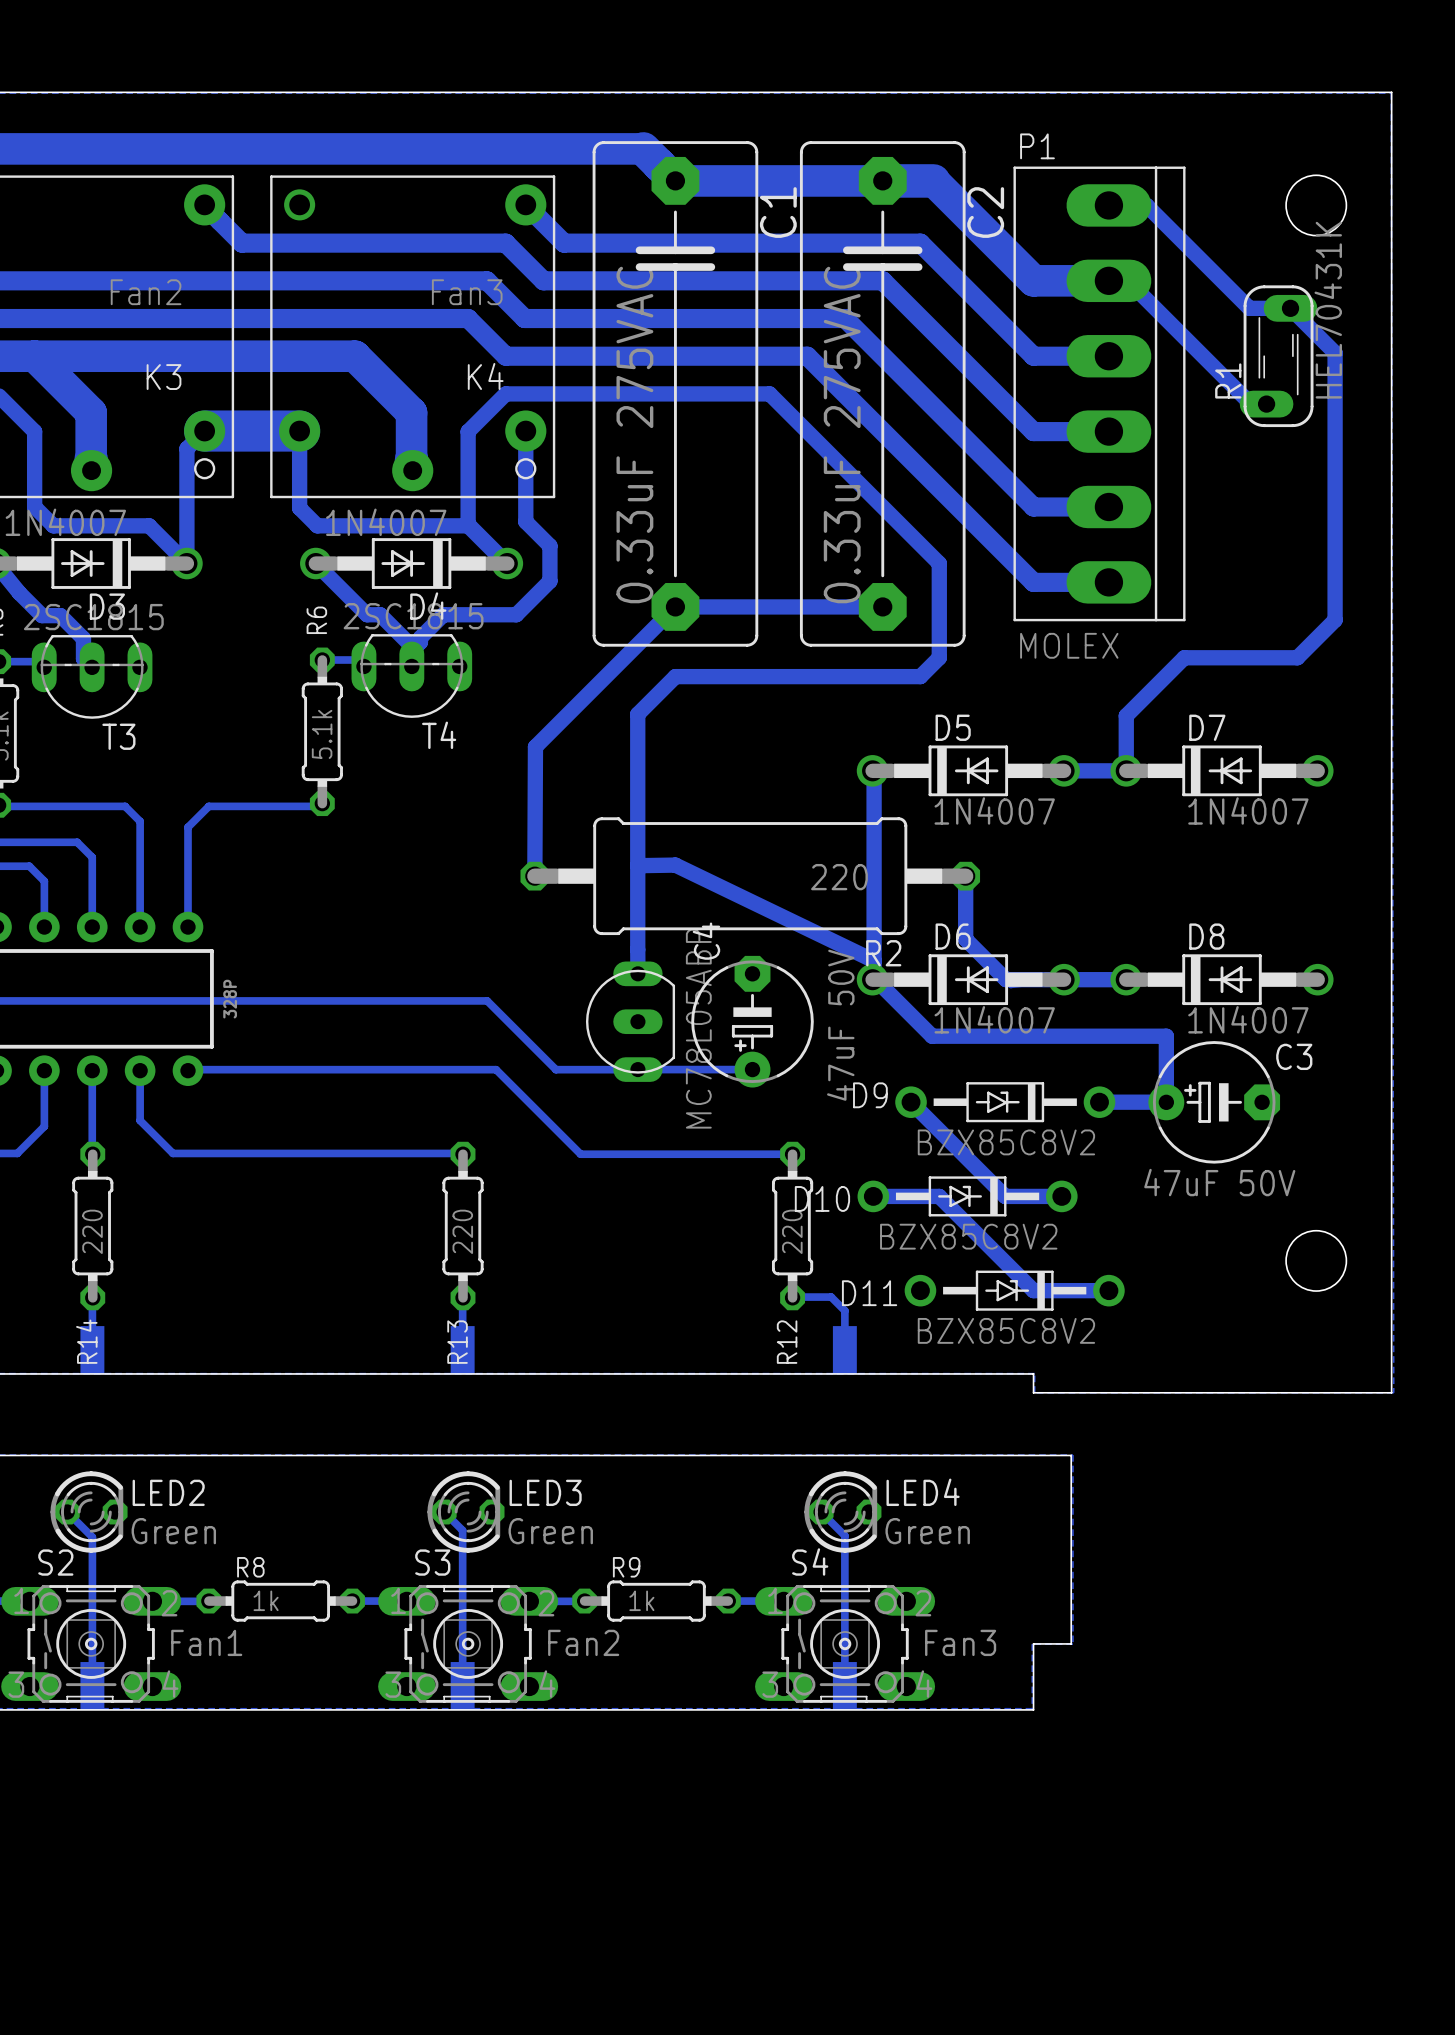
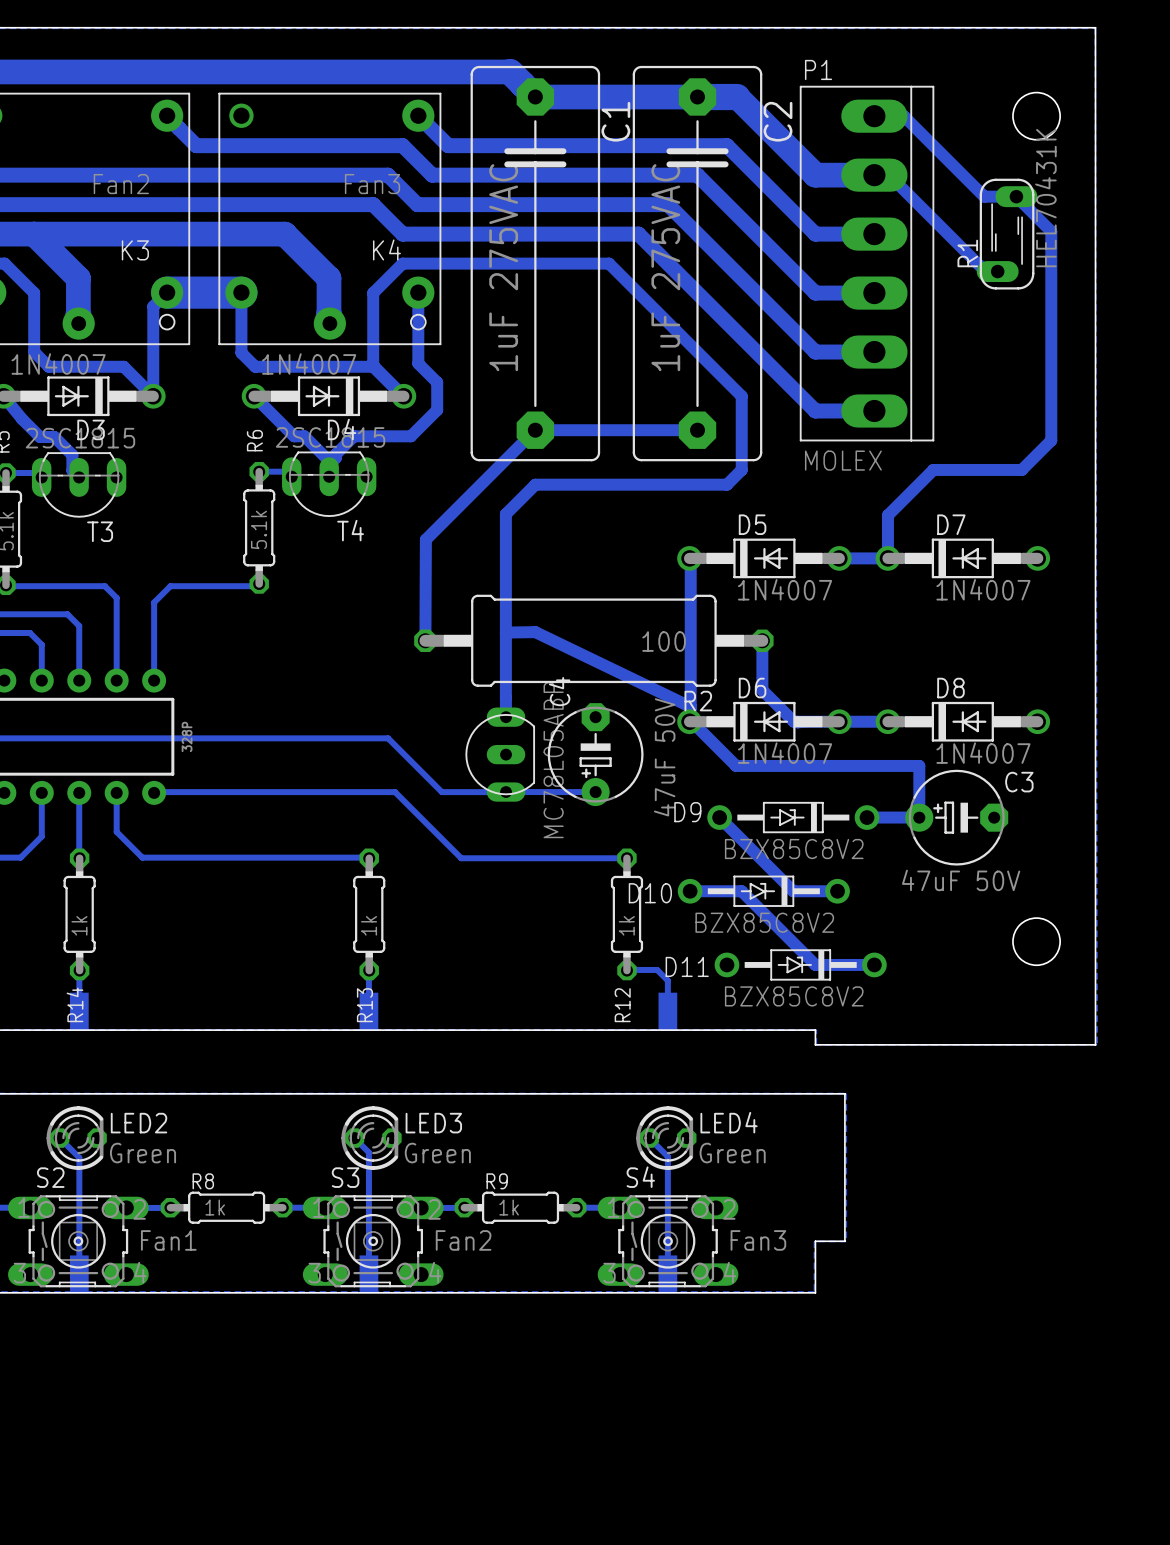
C1 value: 0.33uF 275VAC (634, 435) -> 1uF 275VAC (503, 267)
C2 value: 0.33uF 275VAC (842, 435) -> 1uF 275VAC (665, 267)
R2 value: 220 (839, 877) -> 100 (664, 641)
R14 value: 220 (92, 1231) -> 1k (79, 925)
R13 value: 220 (462, 1231) -> 1k (369, 925)
R12 value: 220 (792, 1231) -> 1k (626, 925)

